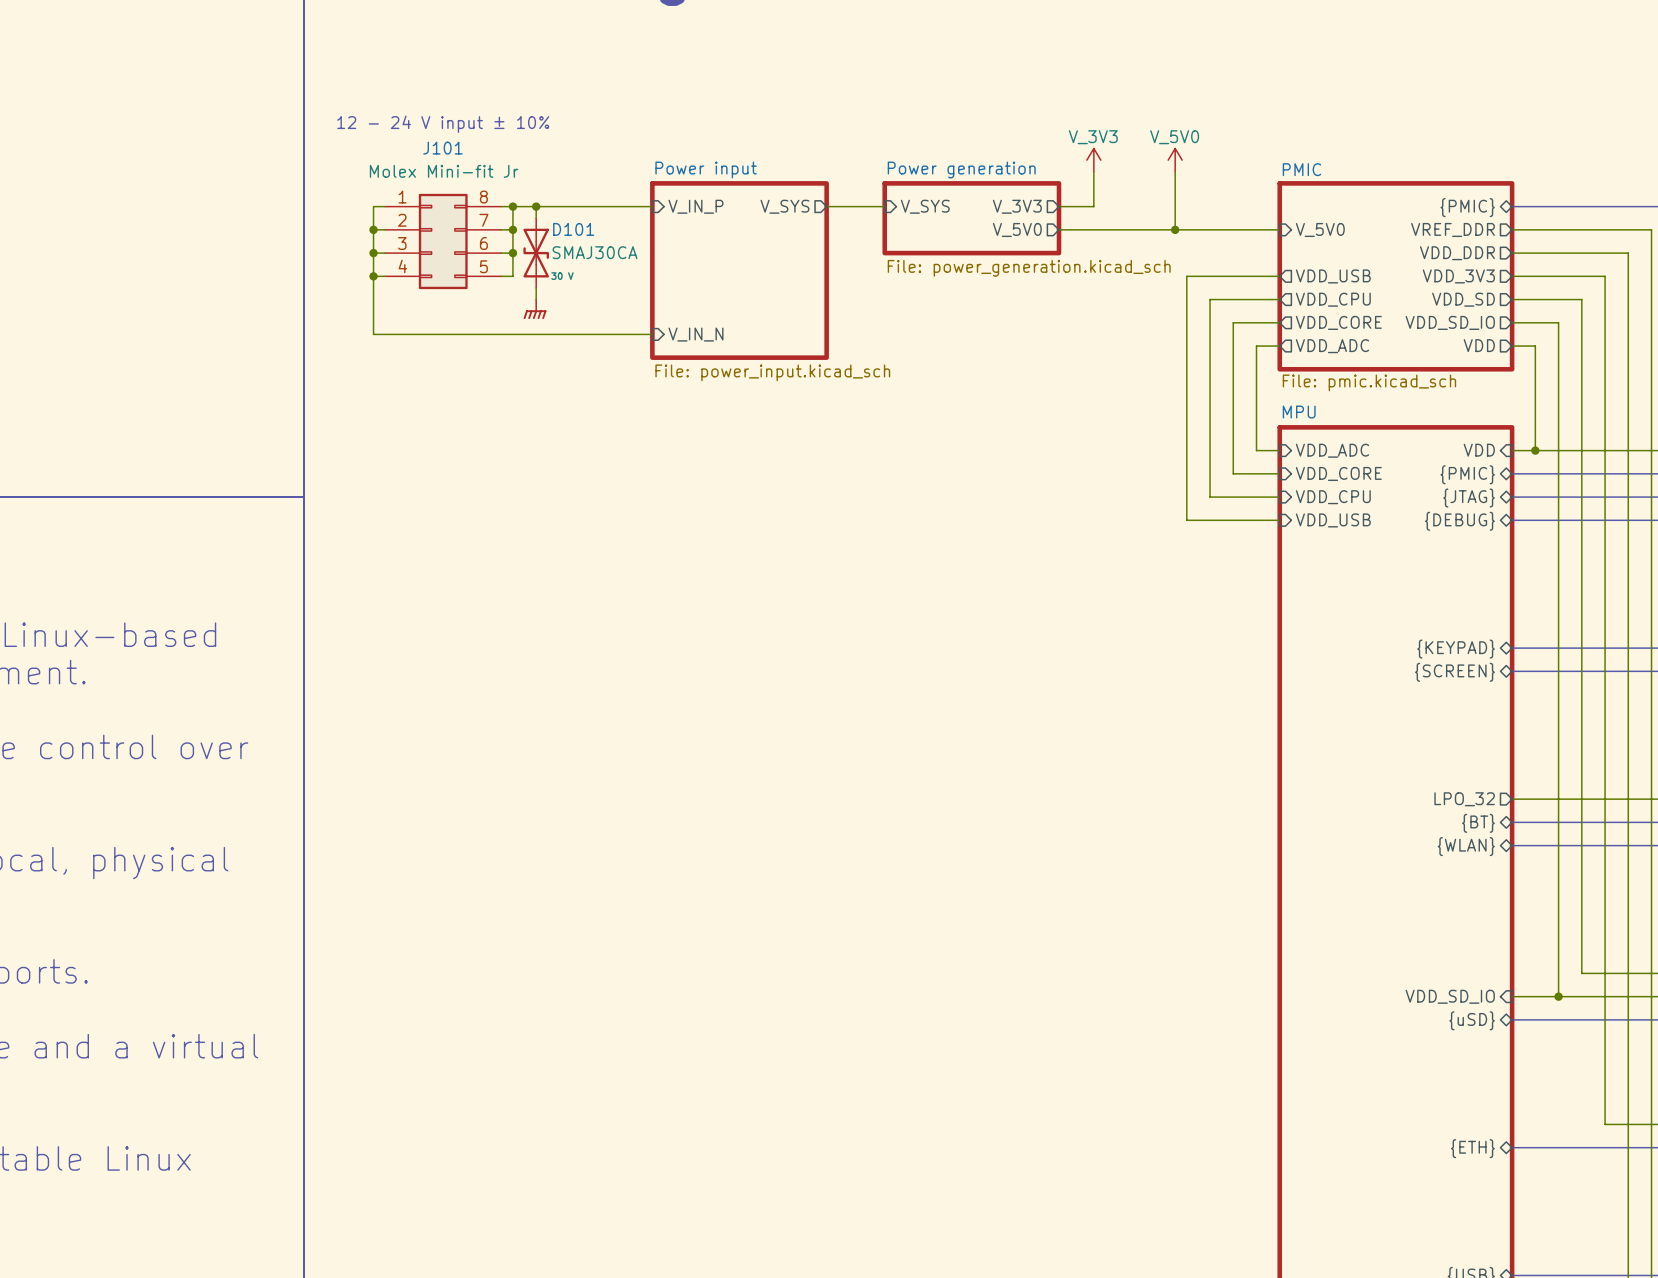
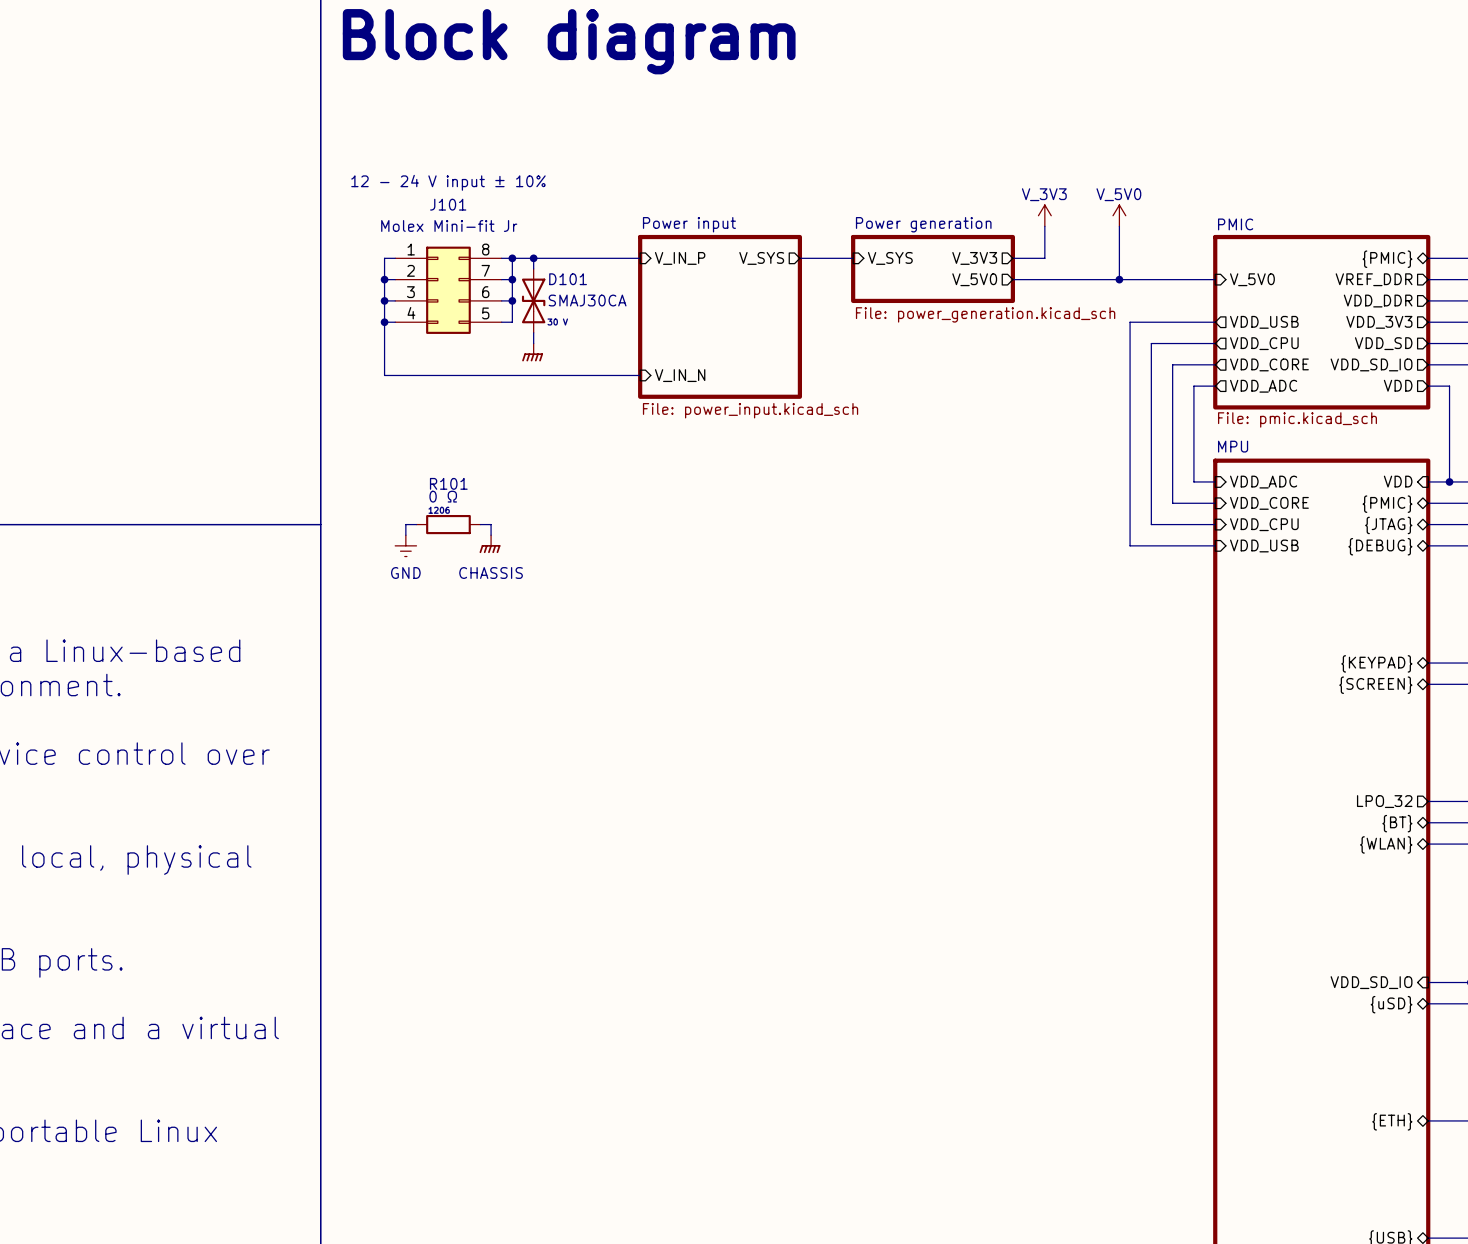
wire: none -> (416, 524) (405, 524) (405, 535)
R101: none -> 0 Ω (448, 524)
wire: none -> (480, 524) (491, 524) (491, 535)
power symbol: none -> CHASSIS (489, 544)
power symbol: none -> GND (405, 545)

